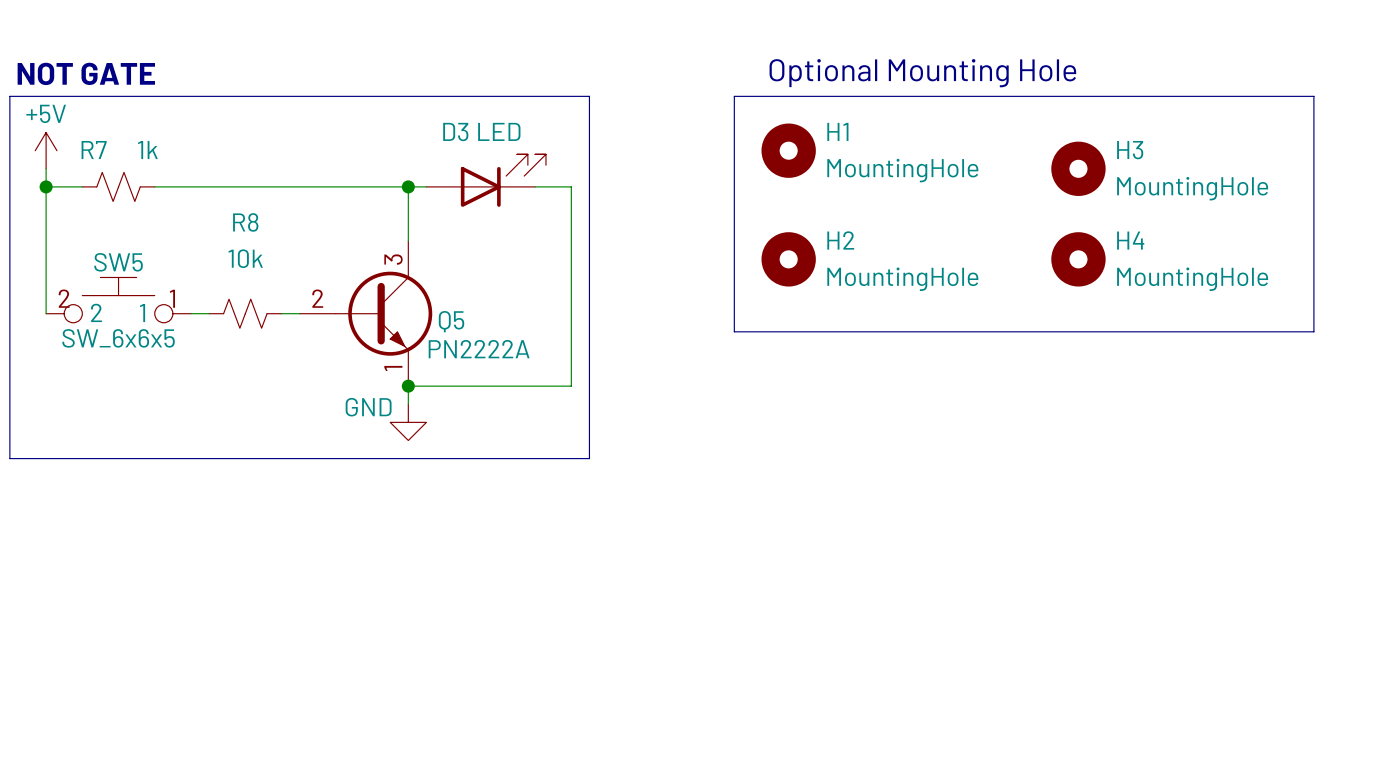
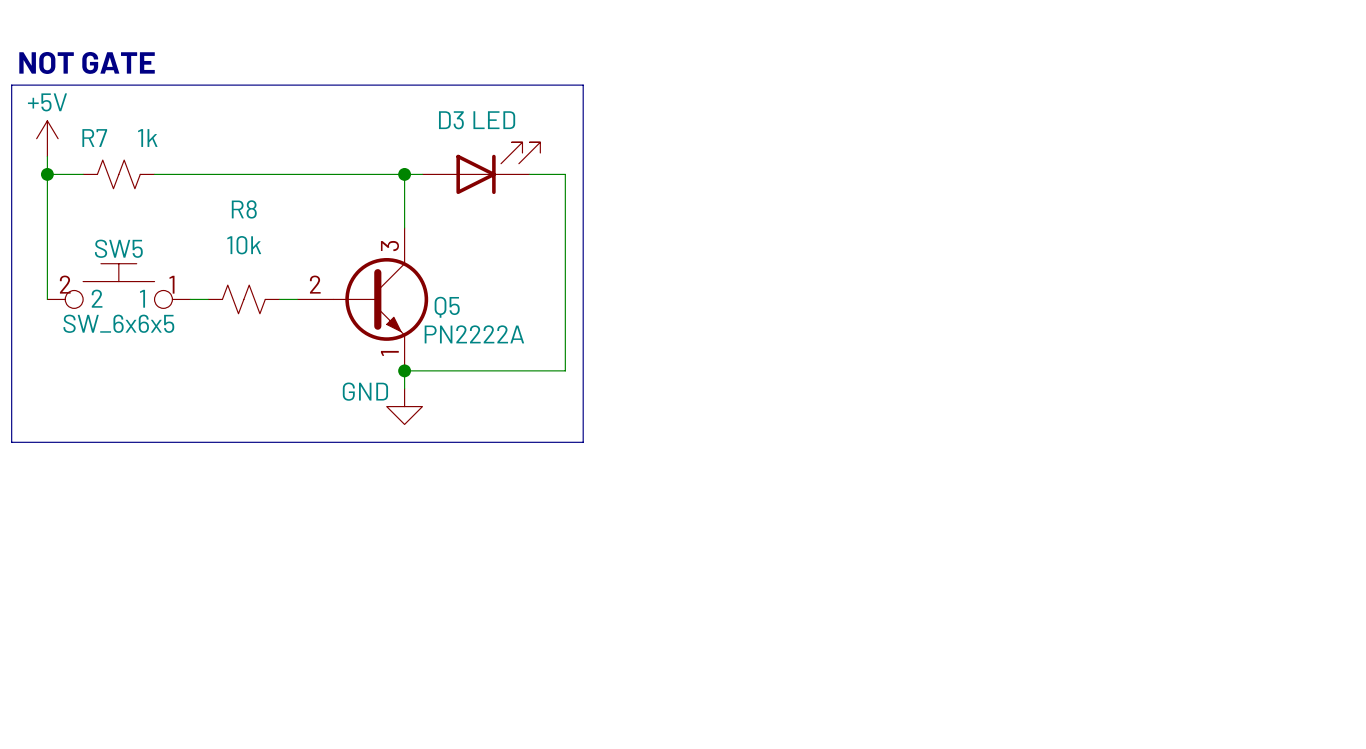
text: Optional Mounting Hole (922, 73) -> none
line: (734, 96) (1313, 96) (1313, 331) (734, 331) (734, 96) -> none
H1: MountingHole (788, 150) -> none
H3: MountingHole (1078, 168) -> none
H2: MountingHole (788, 259) -> none
H4: MountingHole (1078, 259) -> none

